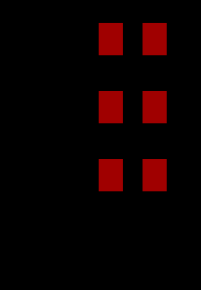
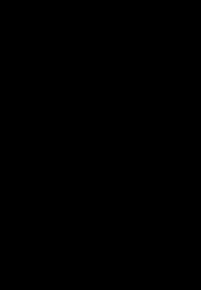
part: (132, 39) -> none
part: (132, 107) -> none
part: (132, 175) -> none

